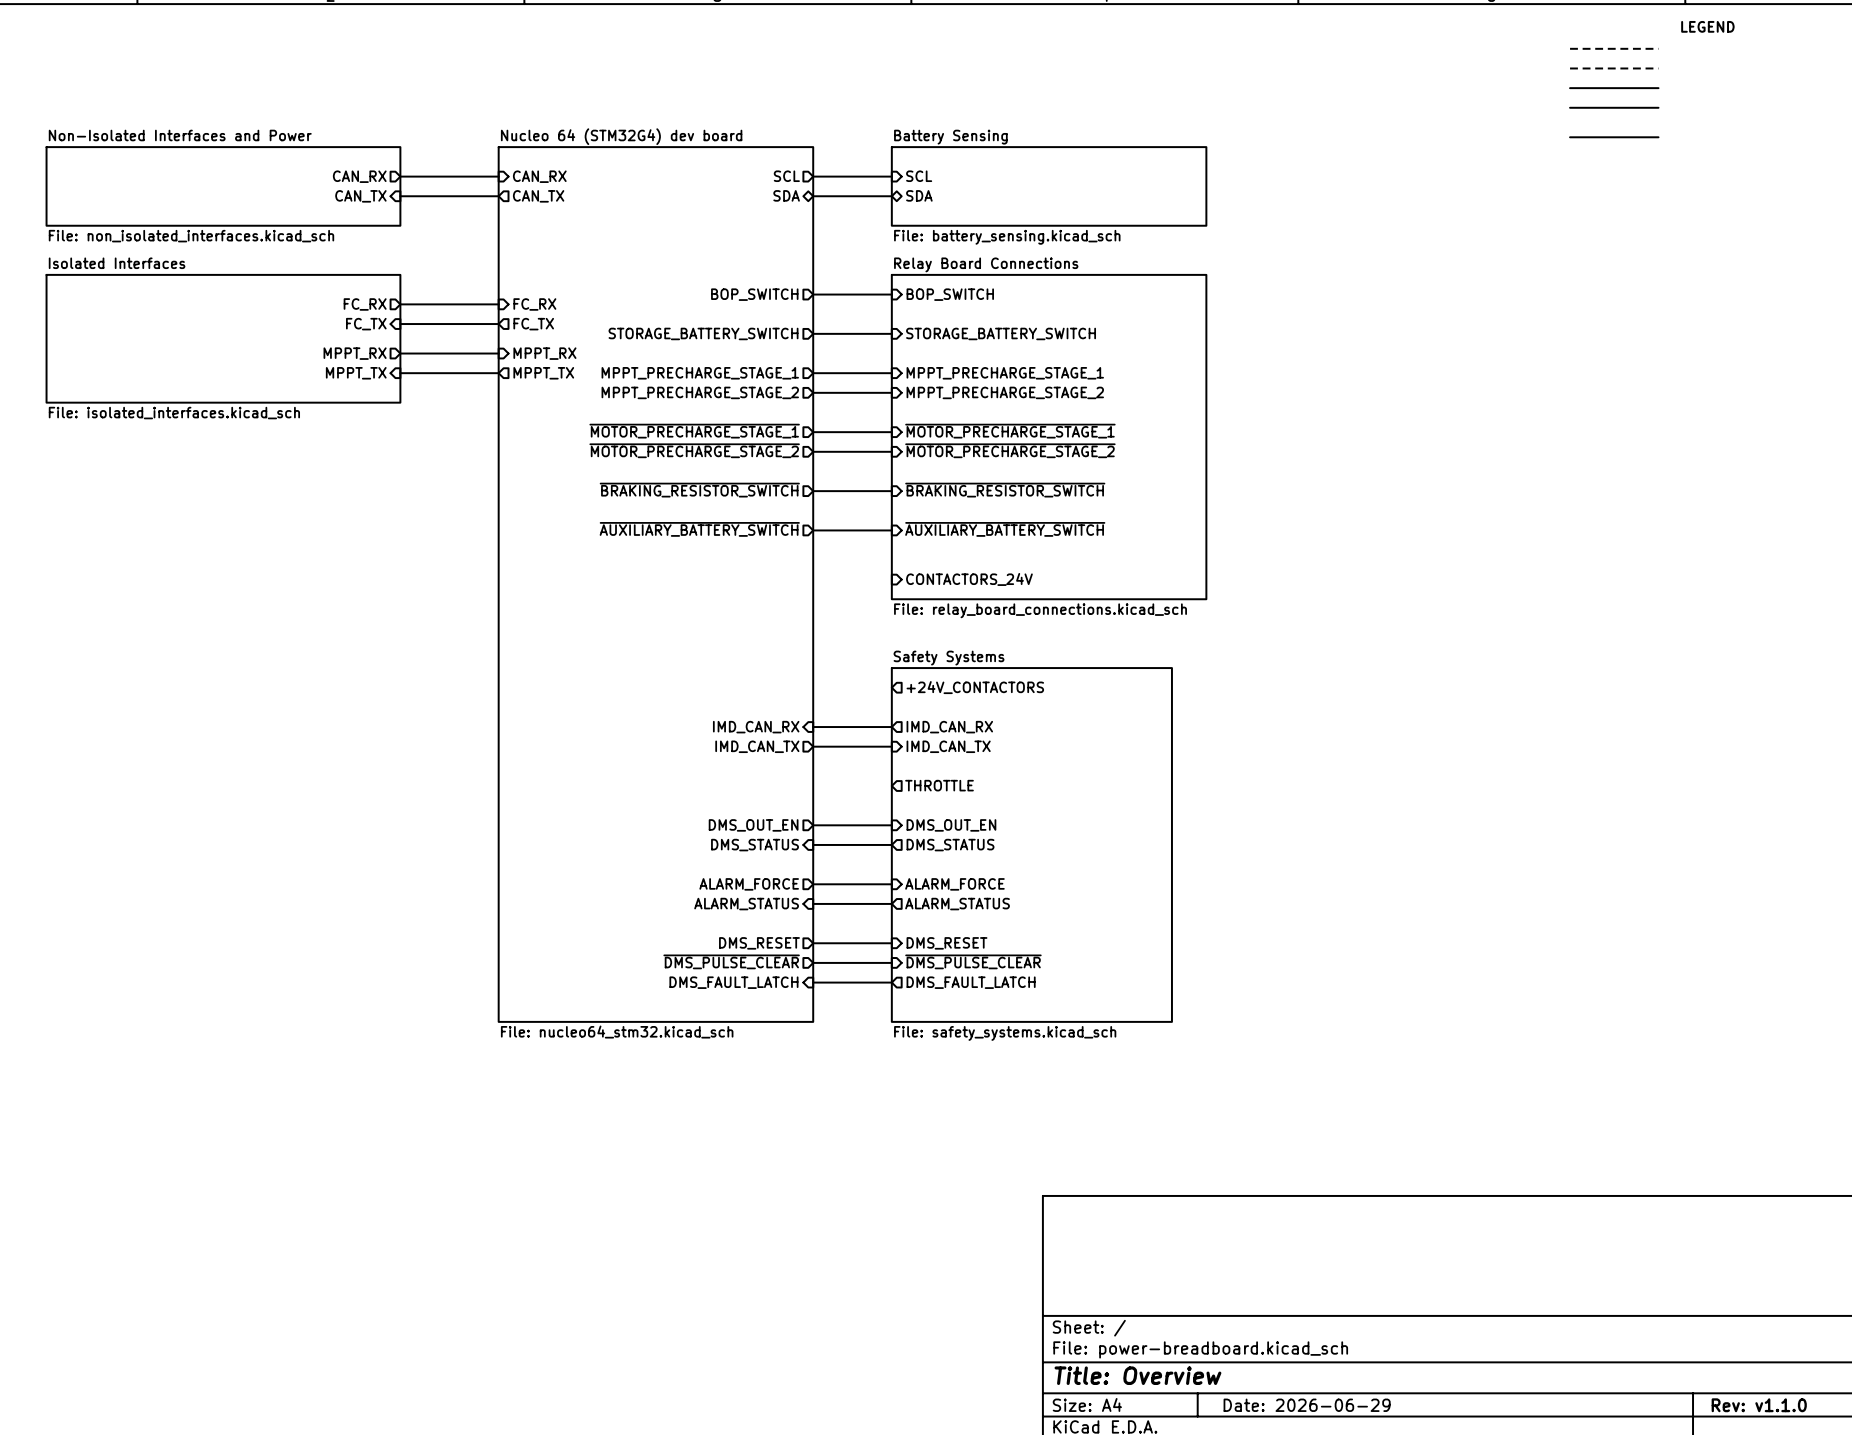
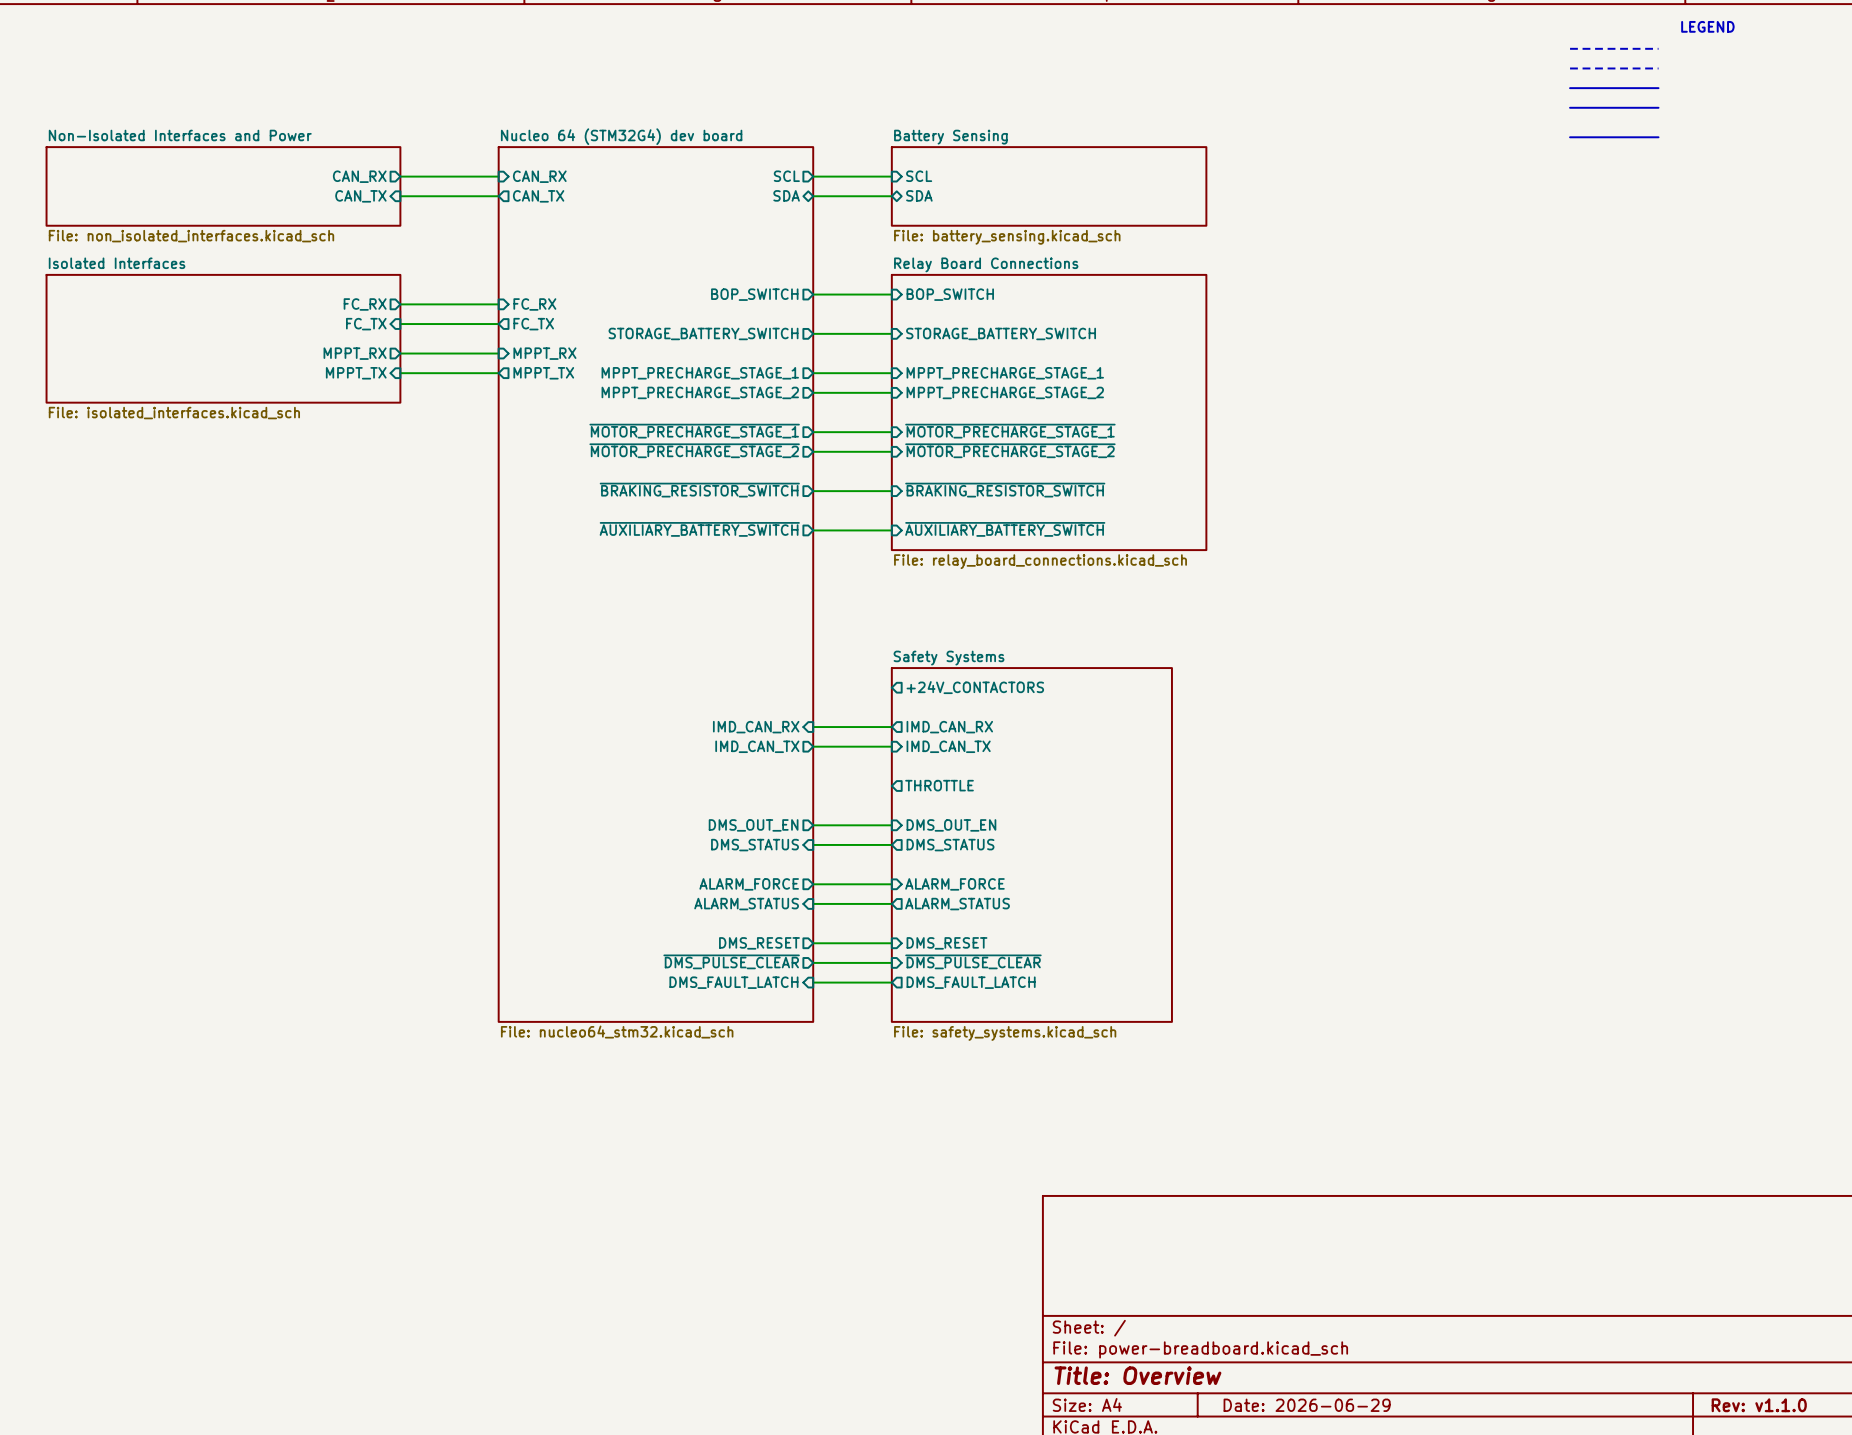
sheet Relay Board Connections: none -> File: relay_board_connections.kicad_sch (1049, 412)
sheet Relay Board Connections: File: relay_board_connections.kicad_sch (1049, 437) -> none
sheet pin: CONTACTORS_24V (969, 579) -> none

